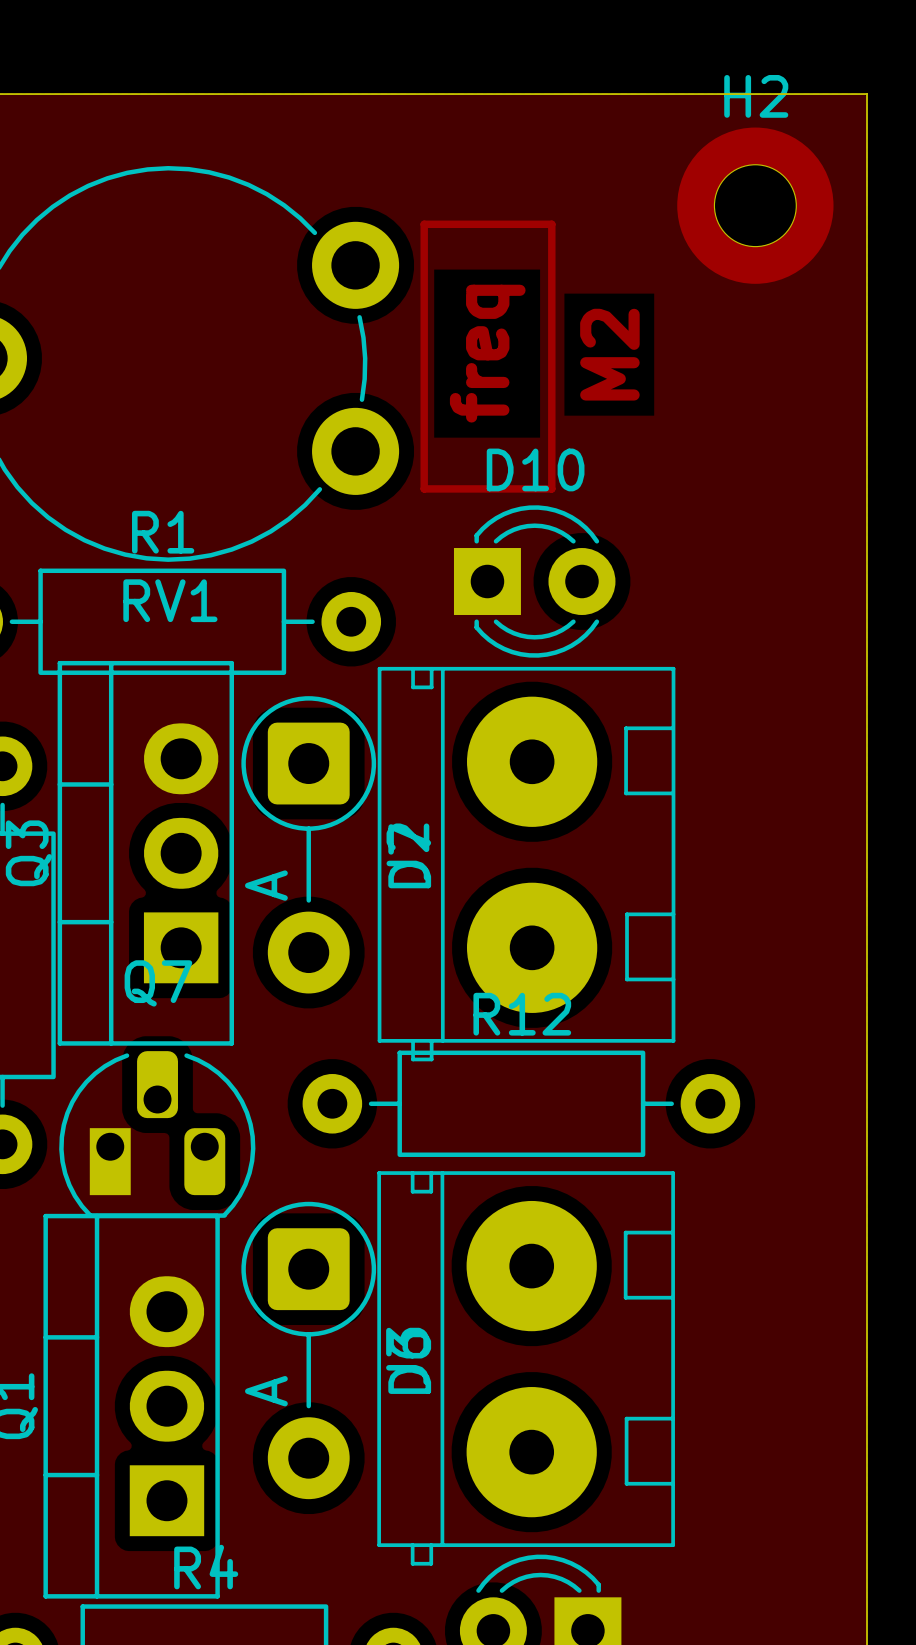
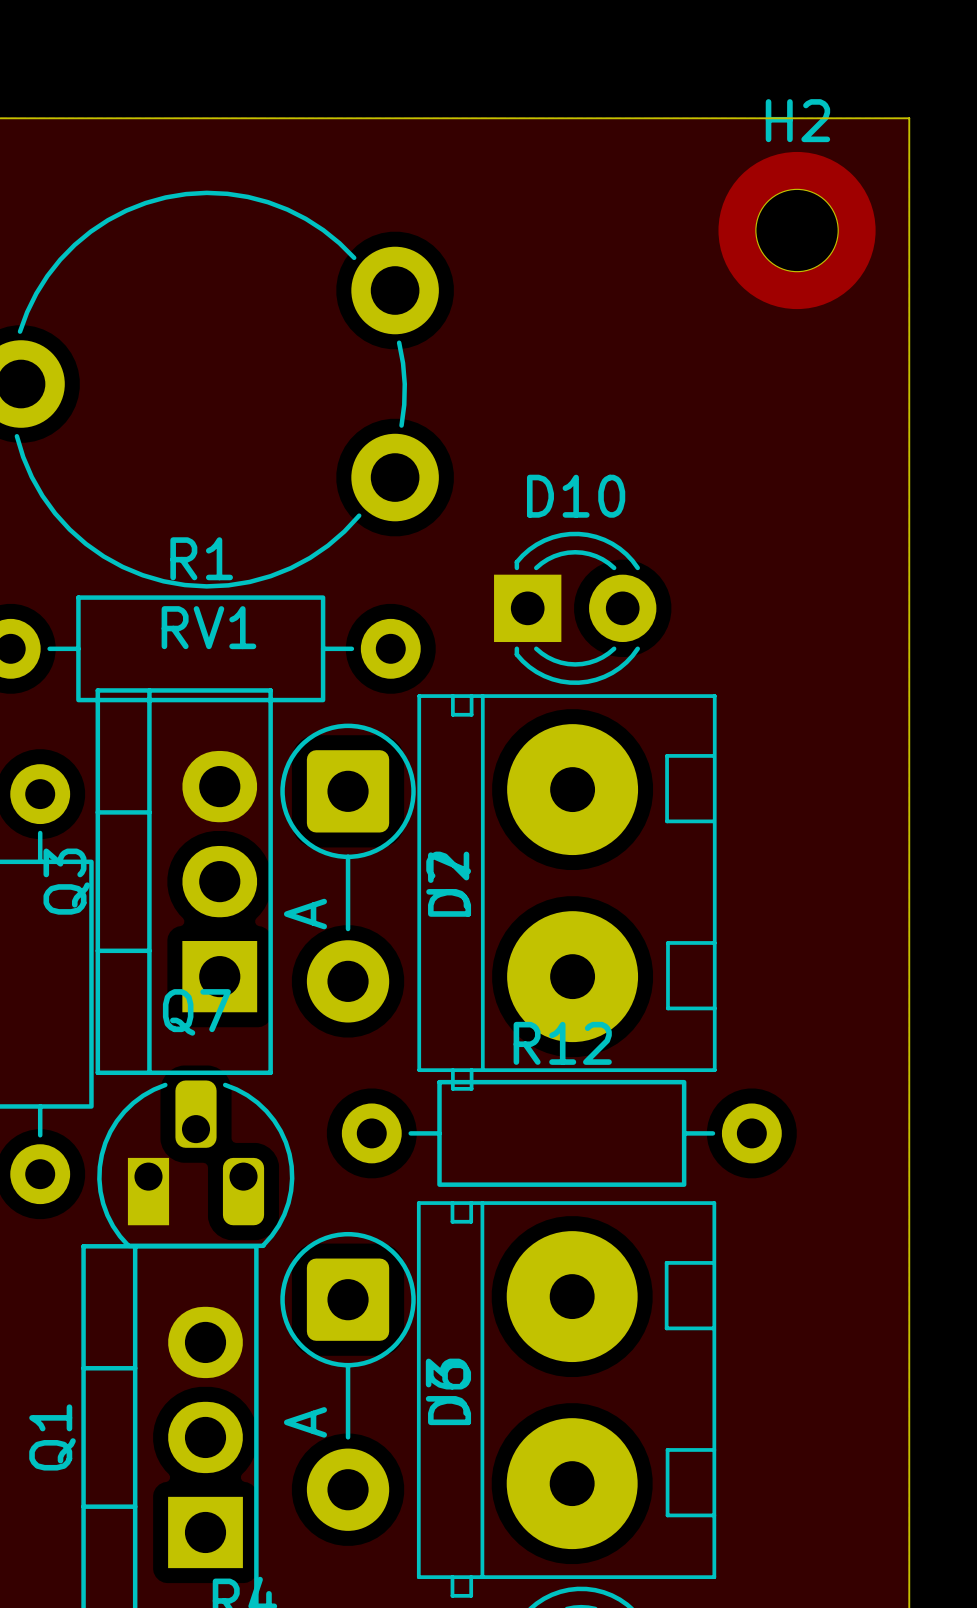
track: (424, 224) (551, 224) (551, 488) (424, 488) (424, 224) -> none
text: freq (487, 353) -> none
text: M2 (609, 354) -> none

